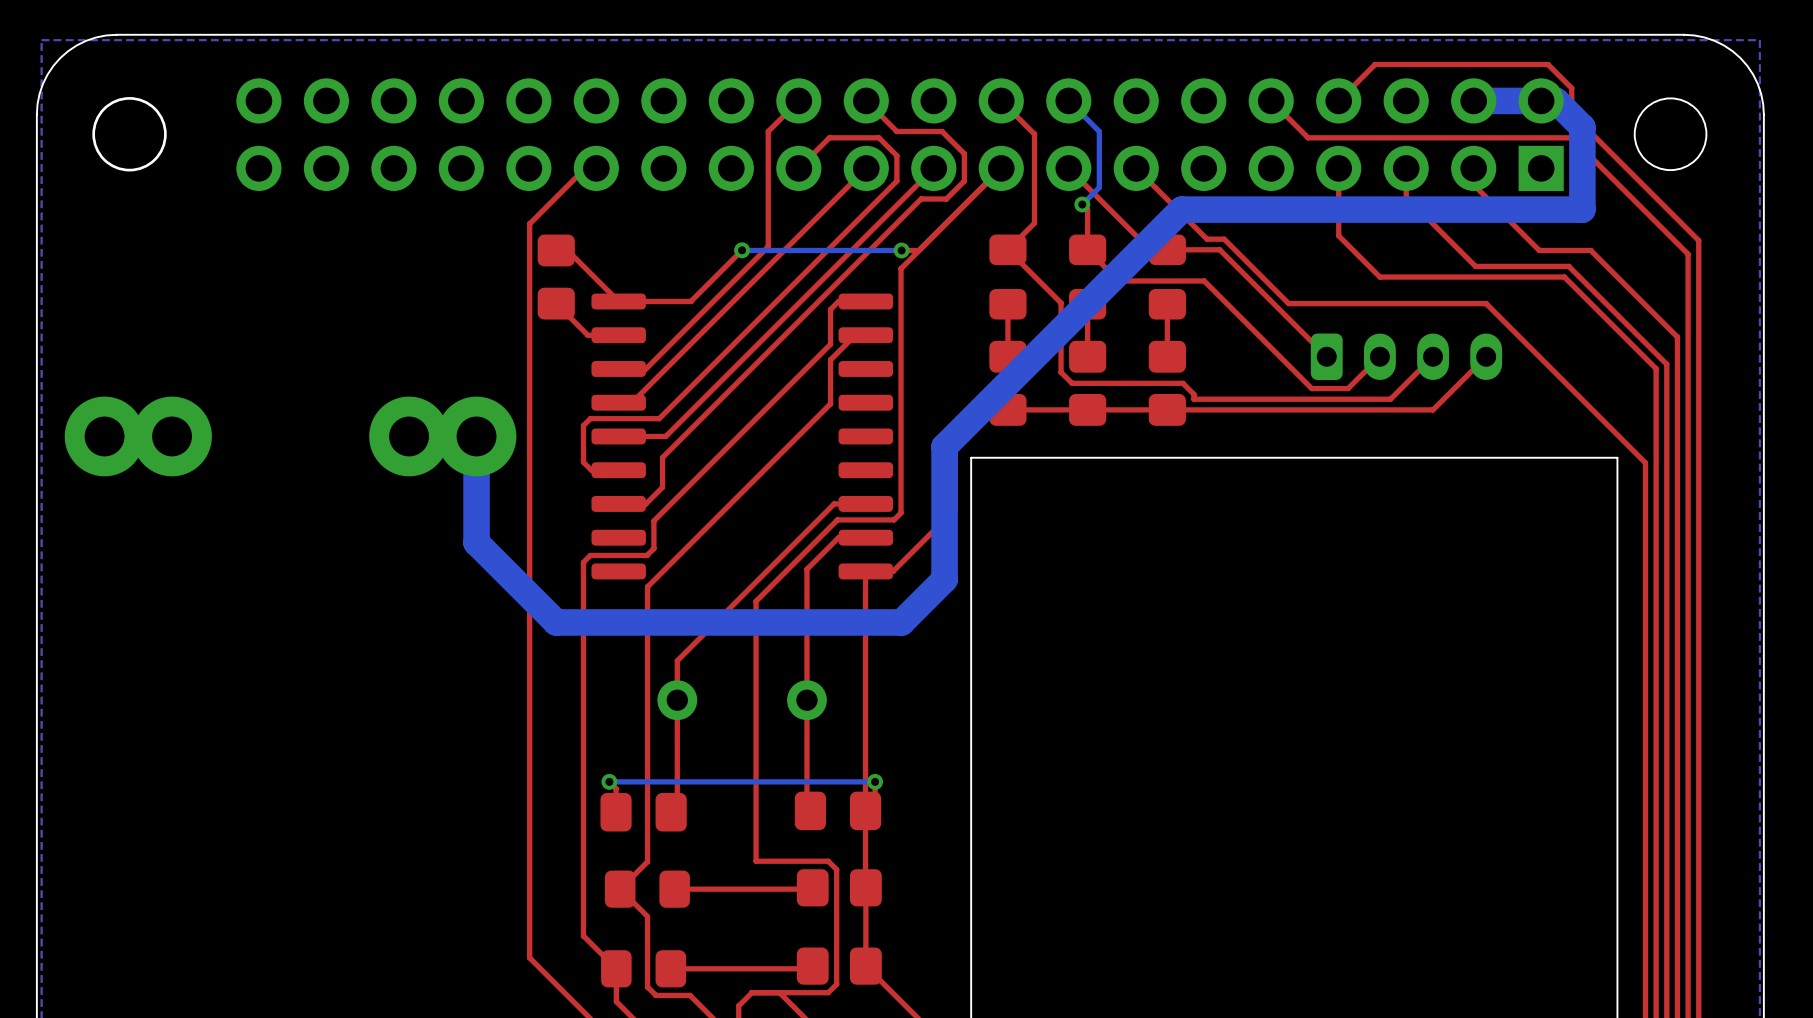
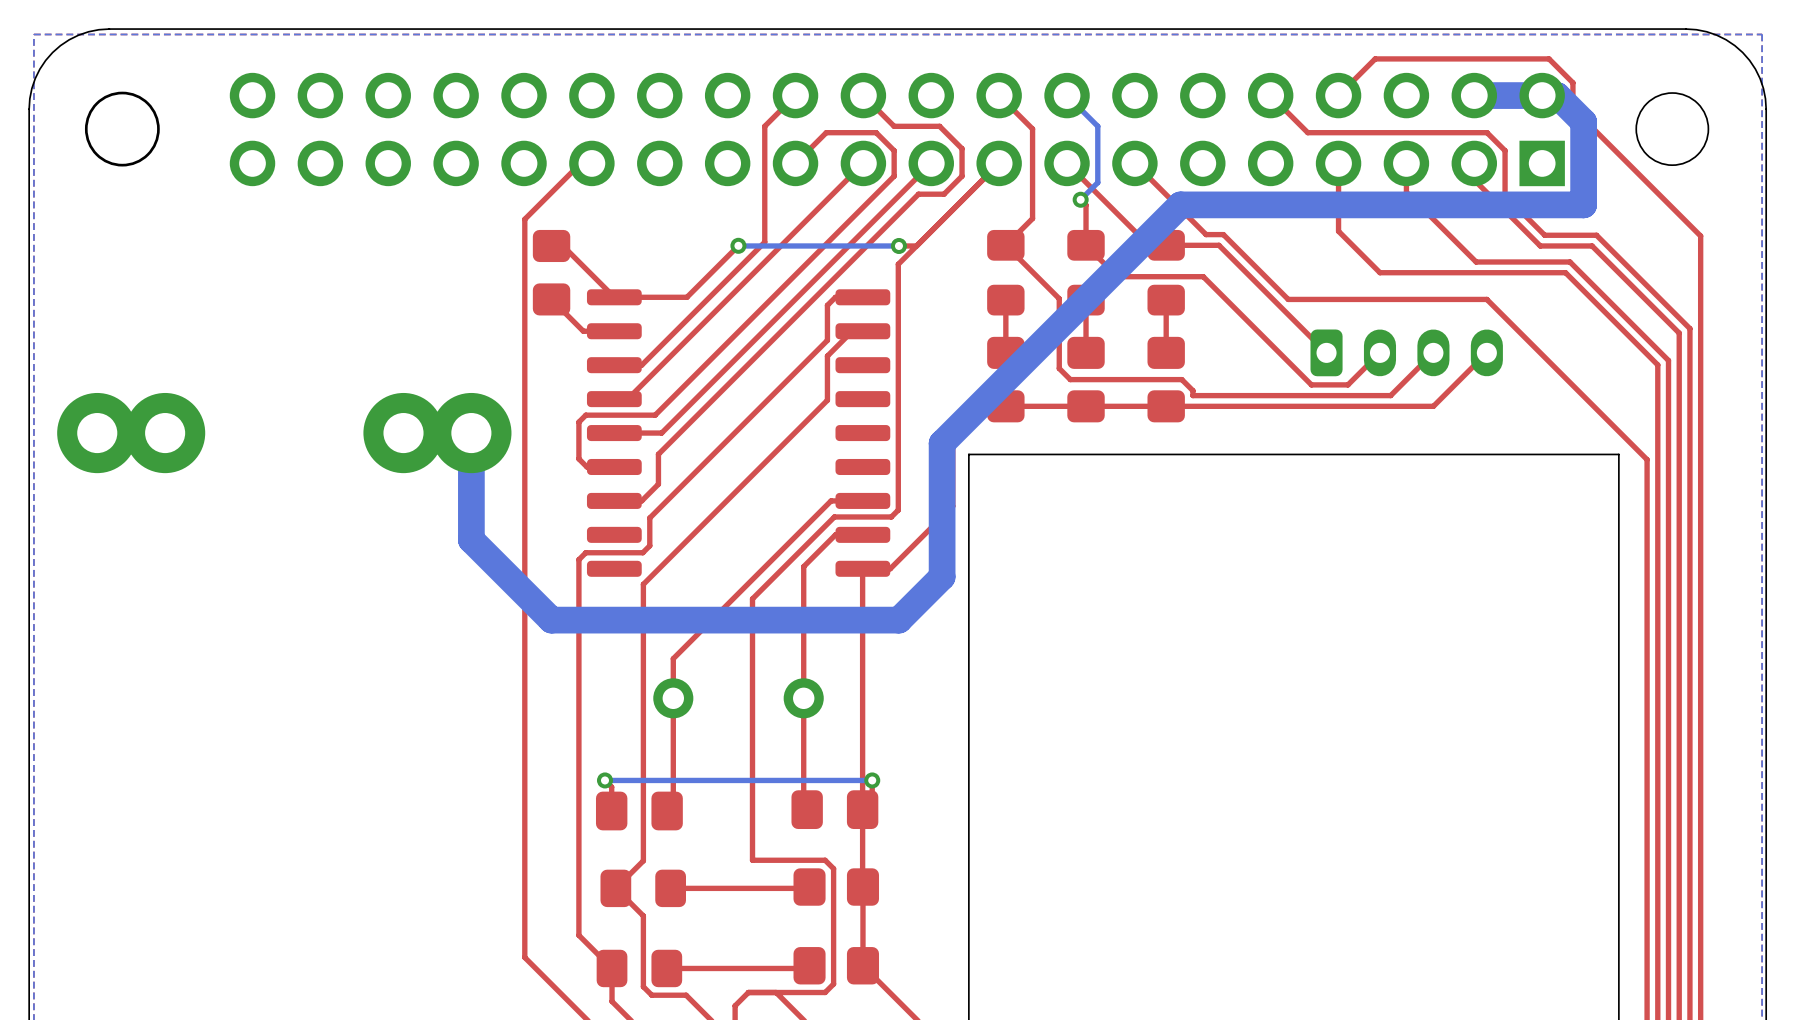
top track: (1486, 137) (1571, 137) (1688, 254) (1688, 332) -> (1487, 132) (1505, 150) (1505, 195) (1544, 235) (1596, 235) (1689, 328)

